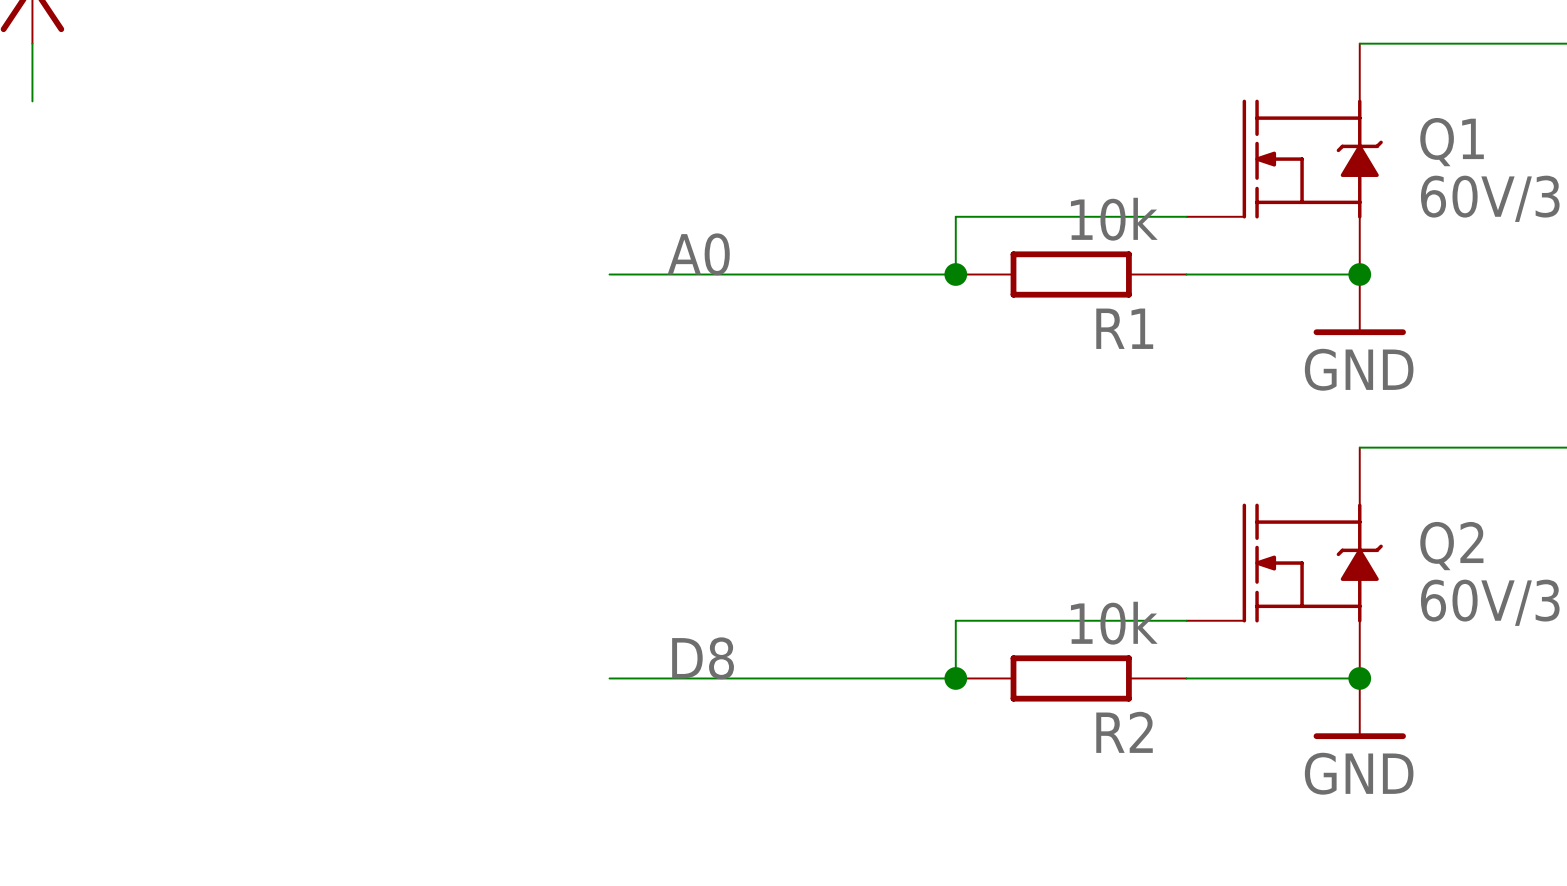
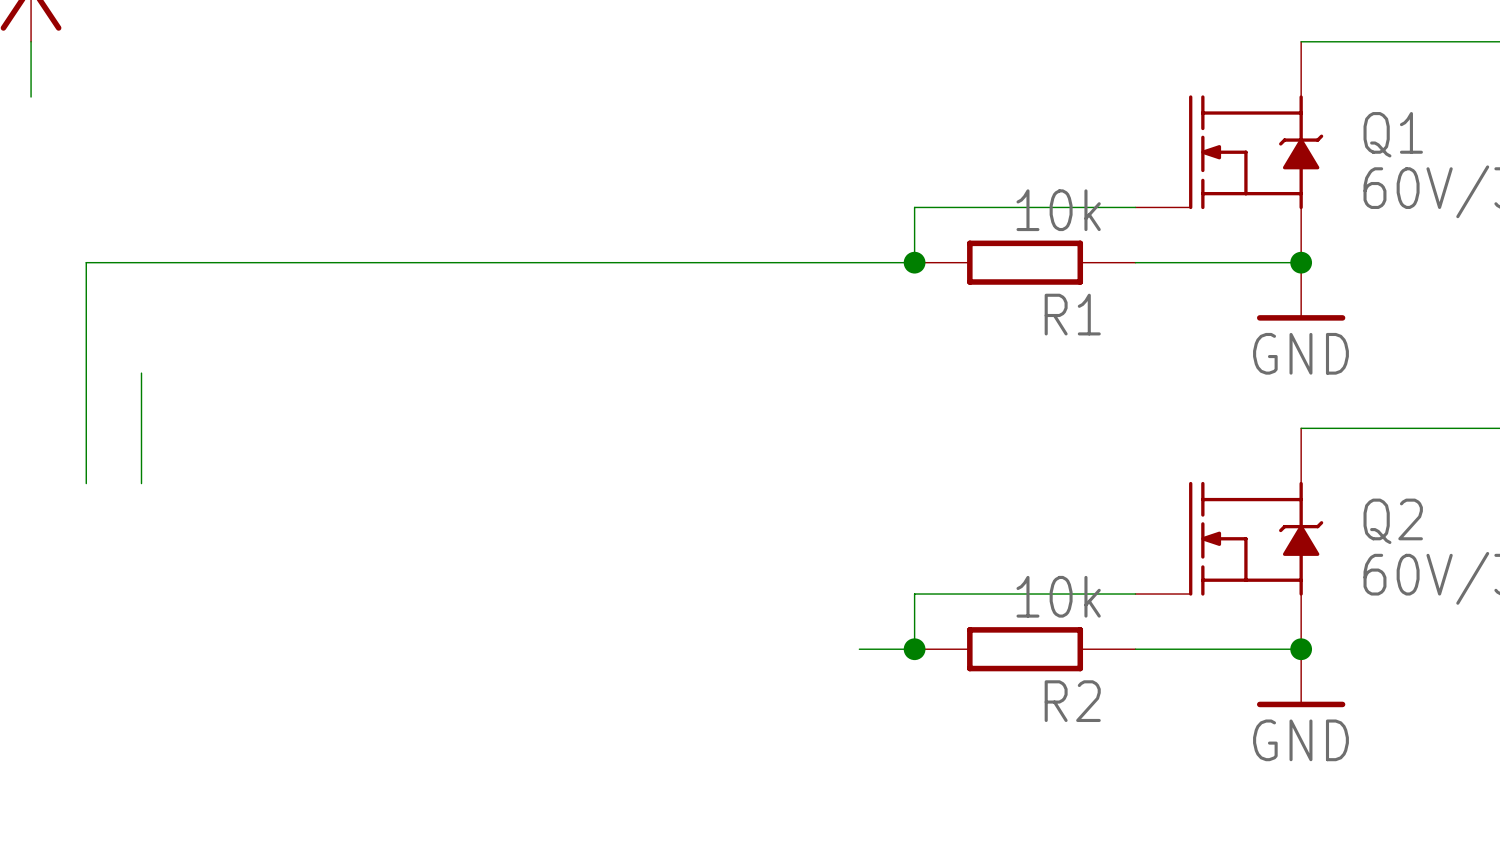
label: A0 (698, 254) -> none
wire: none -> (583, 262) (86, 262) (86, 483)
wire: none -> (141, 373) (141, 483)
label: D8 (703, 658) -> none
wire: (609, 678) (898, 678) -> none

